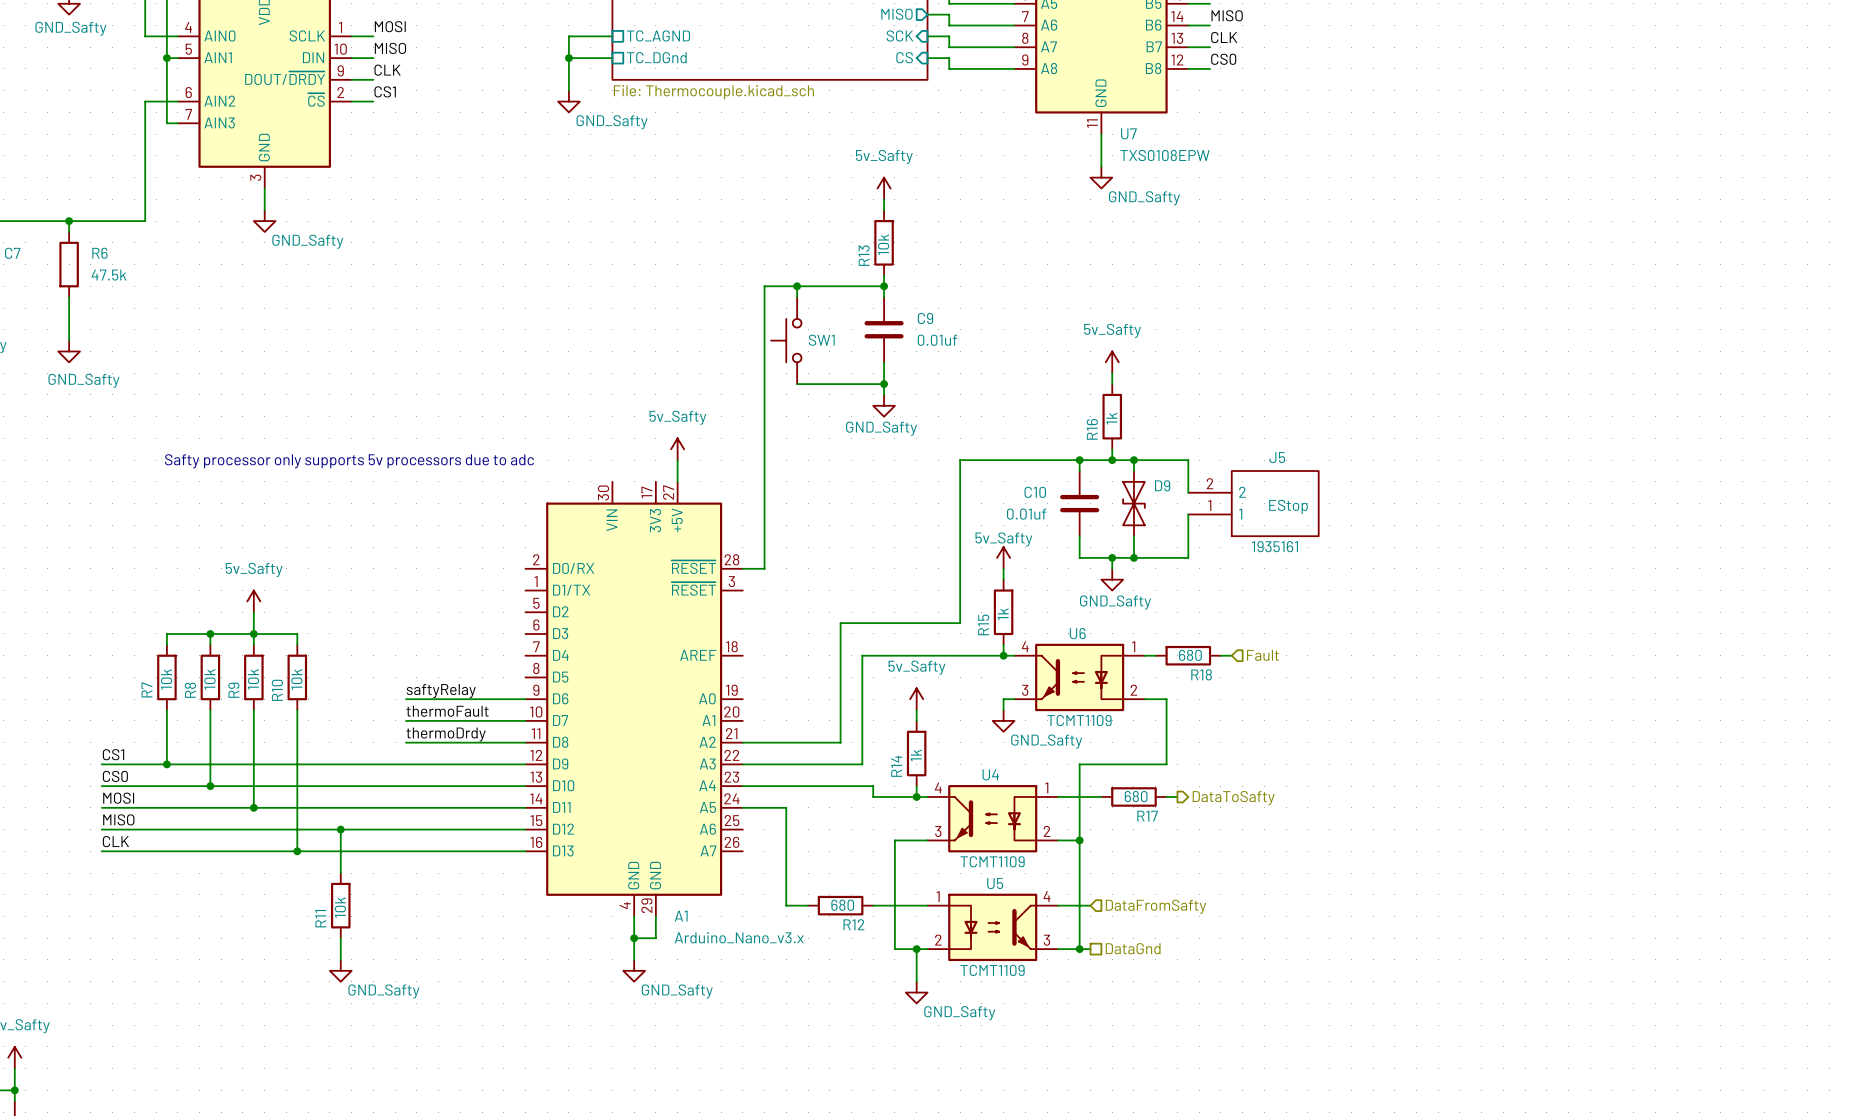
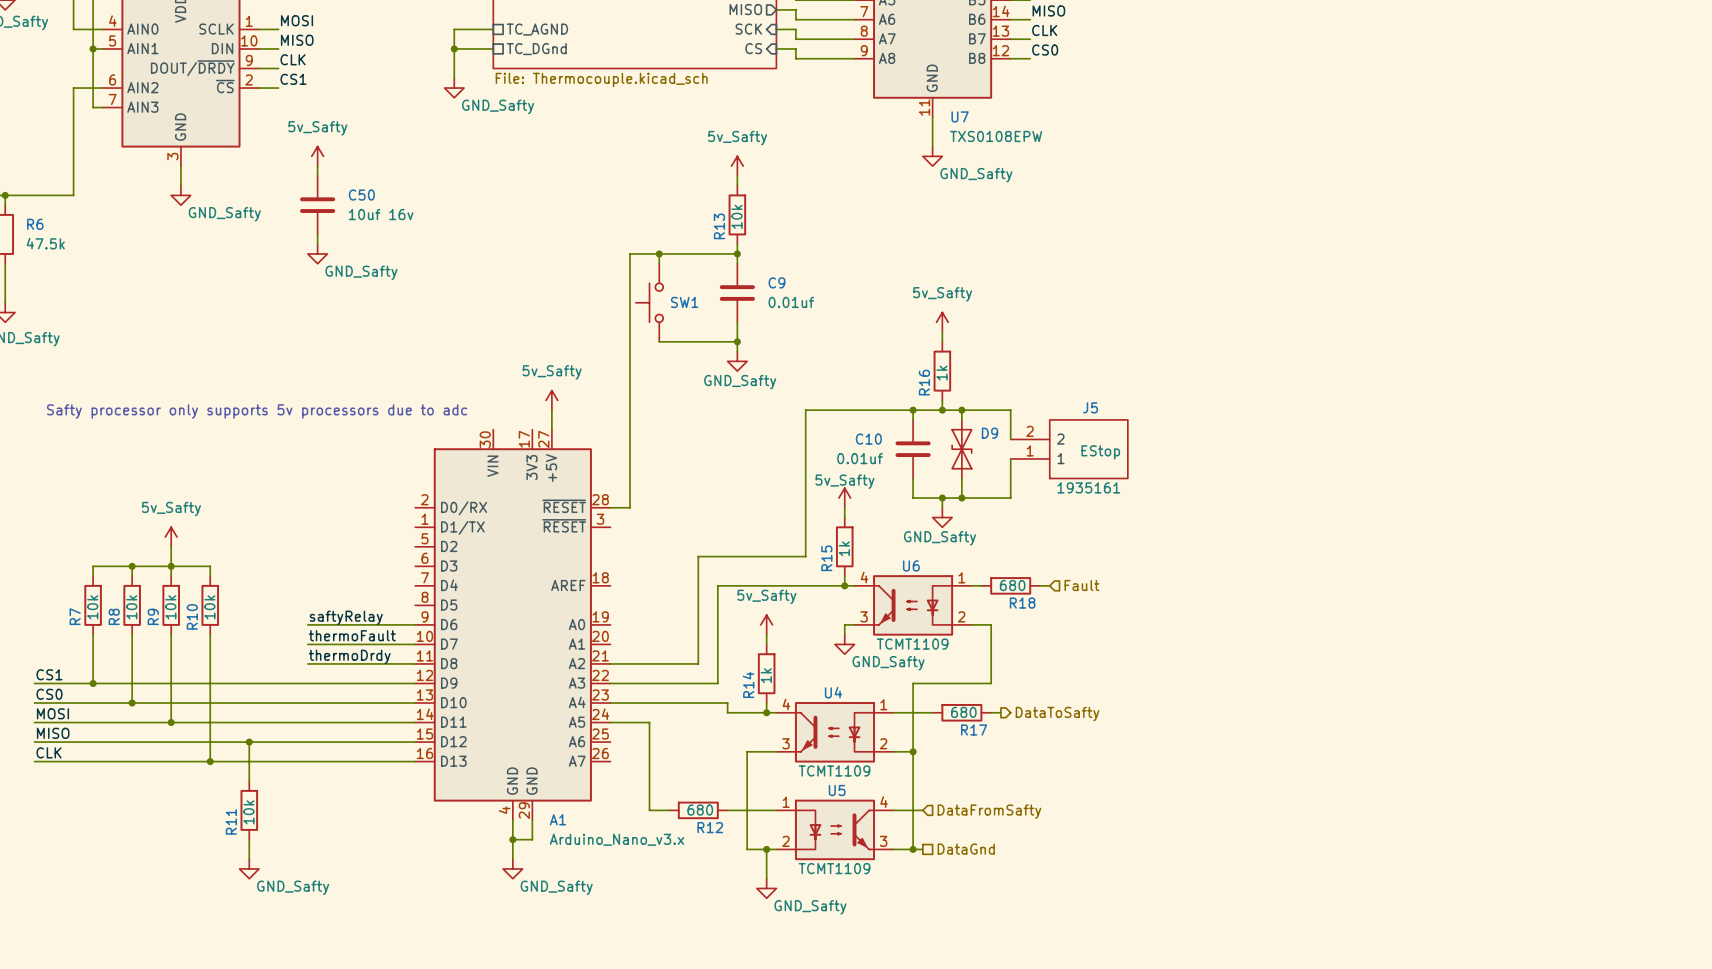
power symbol: none -> 5v_Safty (317, 156)
wire: none -> (317, 166) (317, 175)
C50: none -> 10uf 16v (317, 205)
wire: none -> (317, 234) (317, 244)
power symbol: none -> GND_Safty (317, 253)

